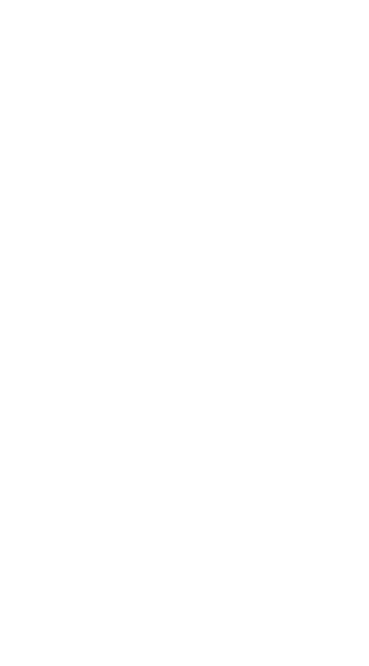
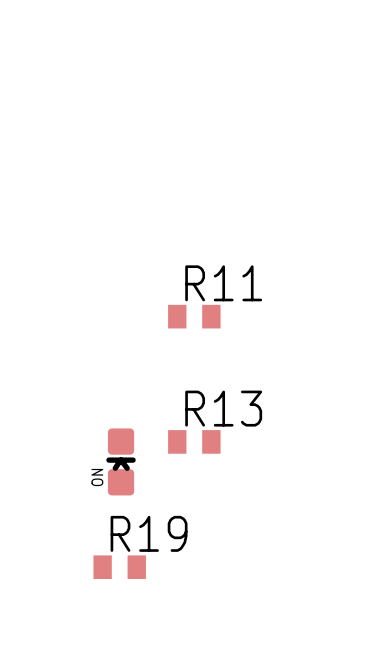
R11: none -> (194, 316)
R13: none -> (194, 441)
ON: none -> (121, 461)
R19: none -> (119, 567)

